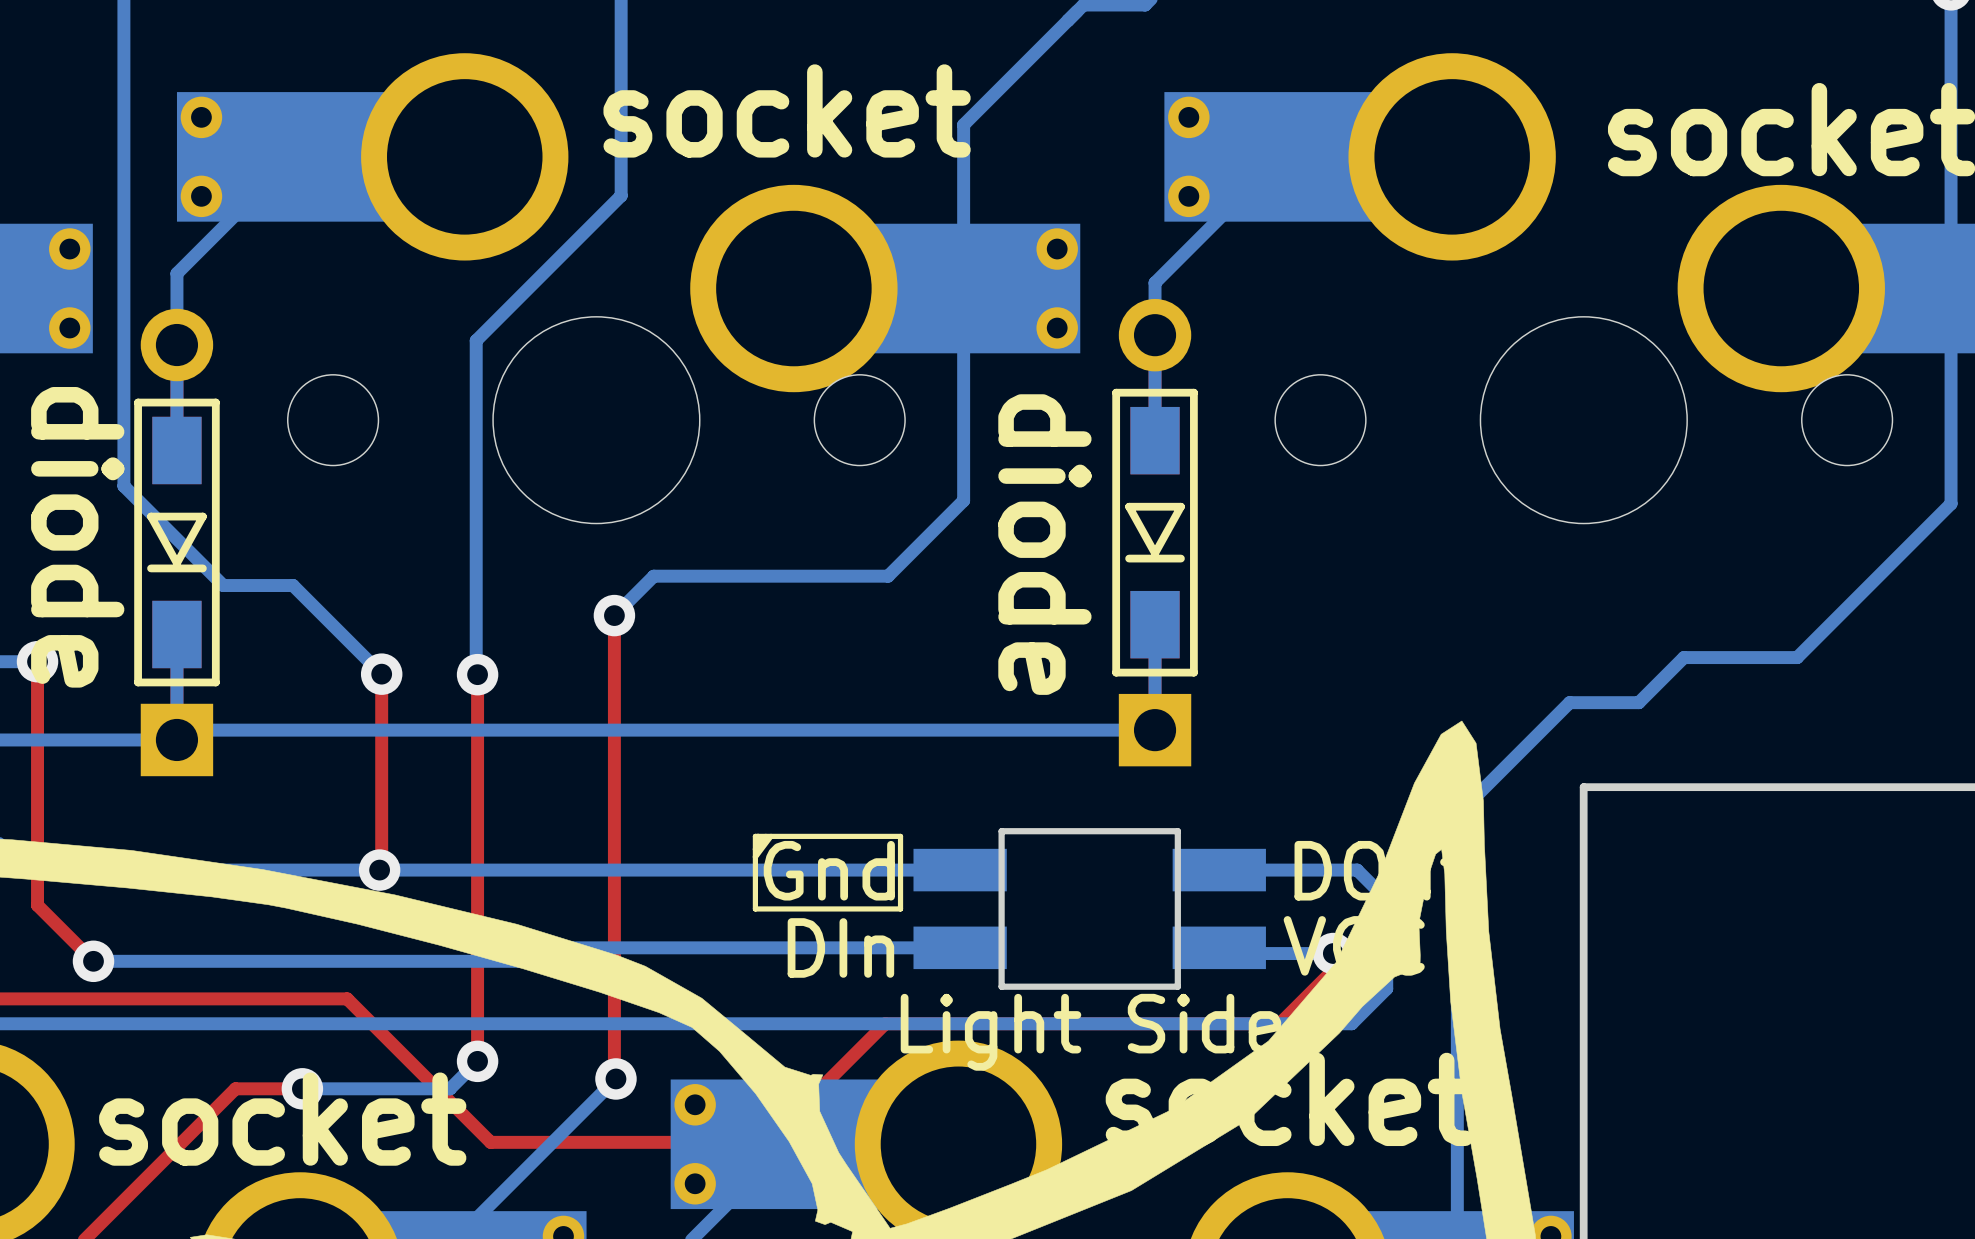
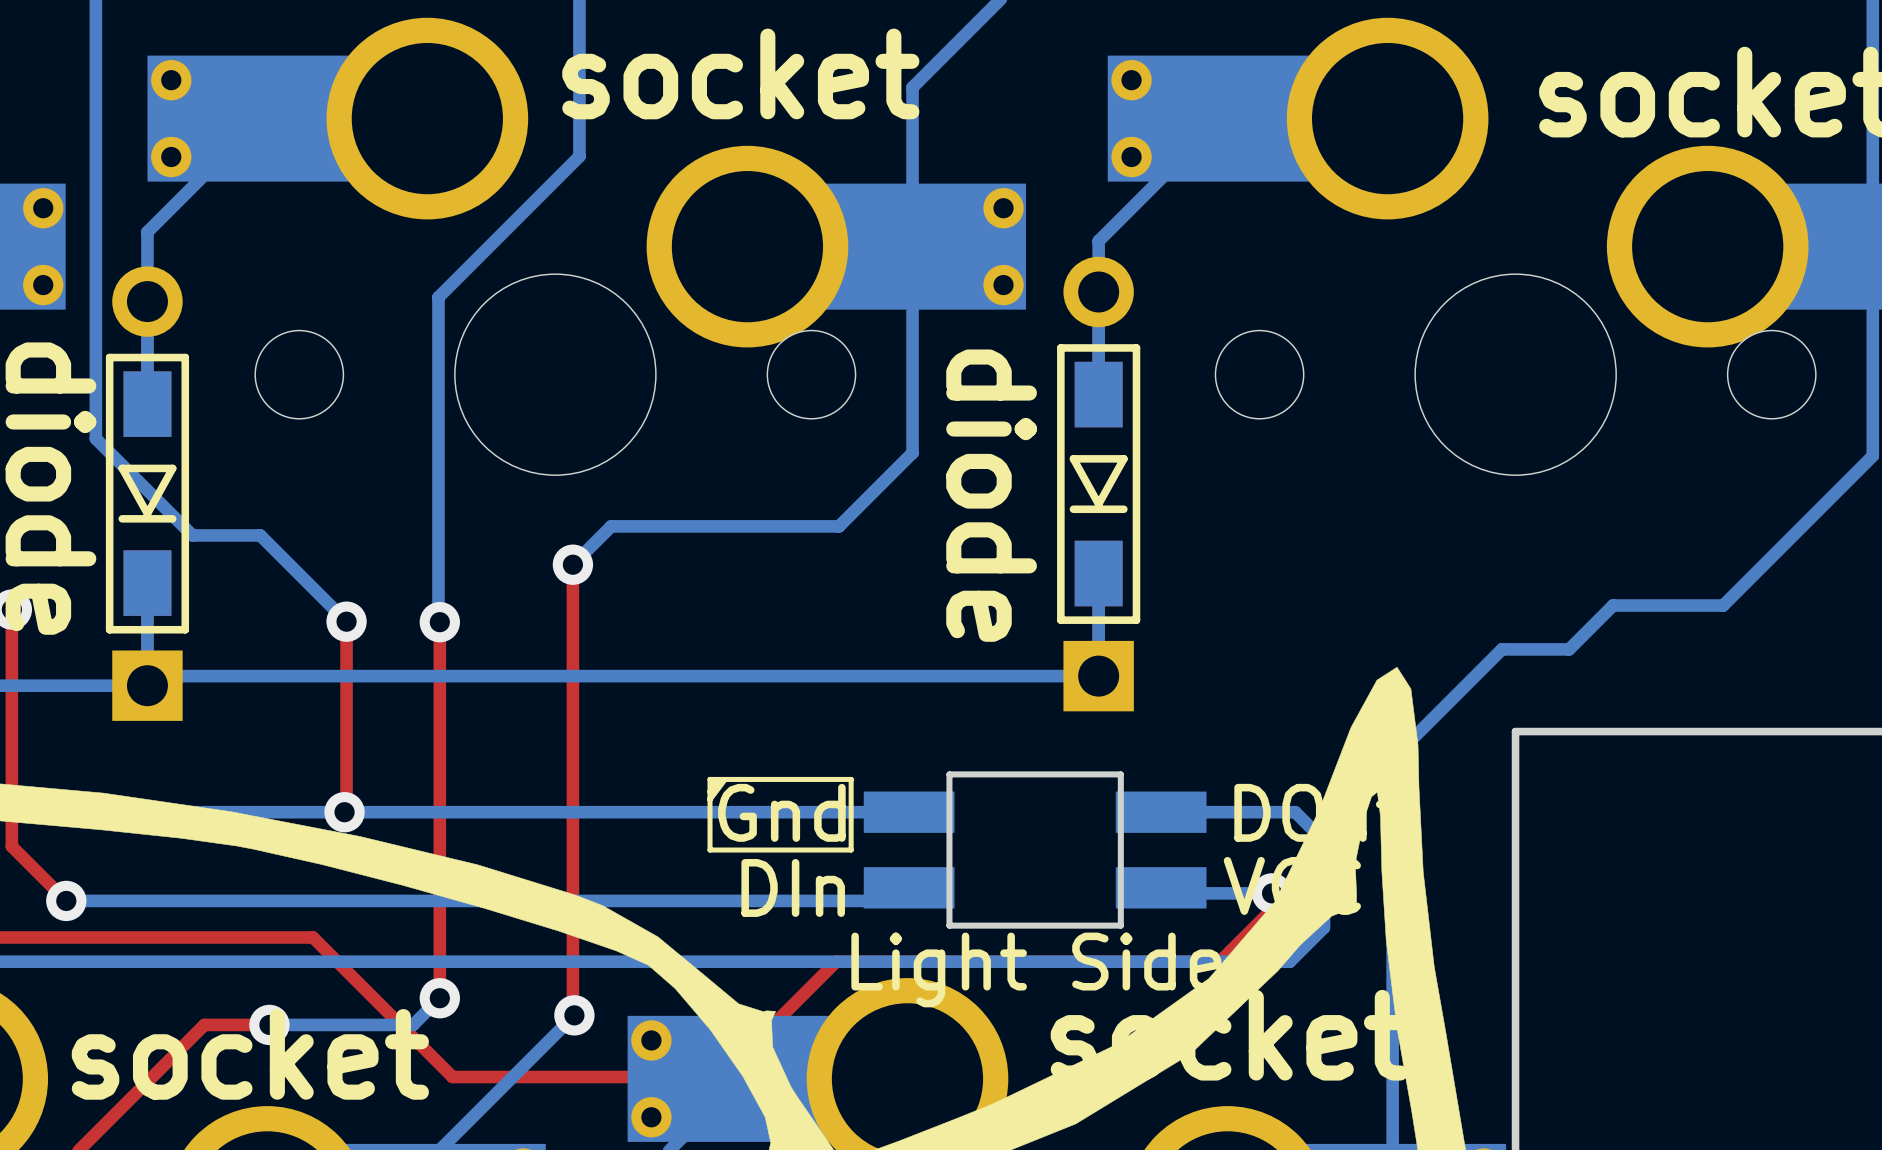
bottom track: (960, 947) (566, 947) (552, 961) -> (909, 888) (921, 900) (512, 900)

